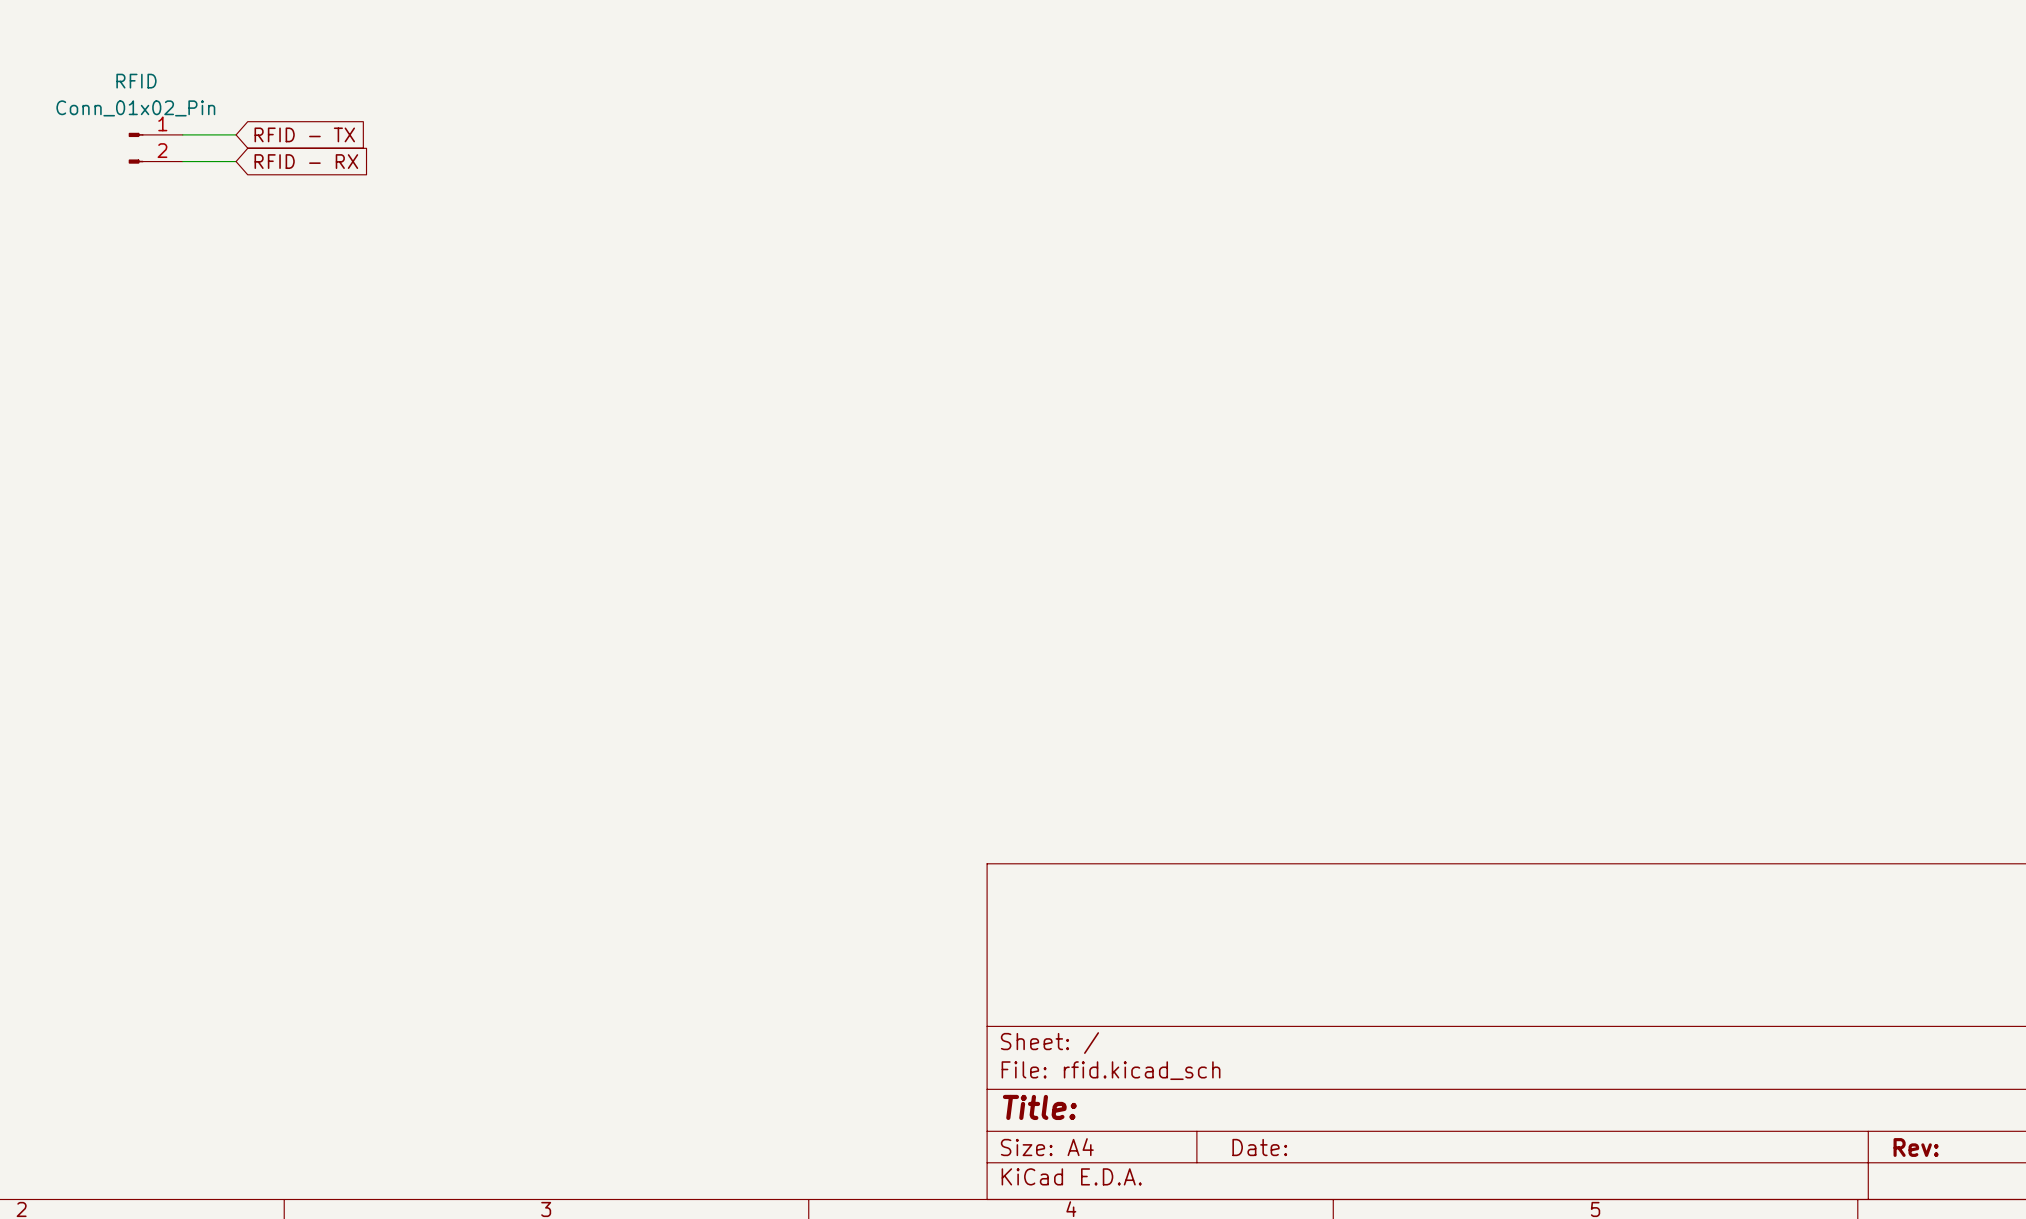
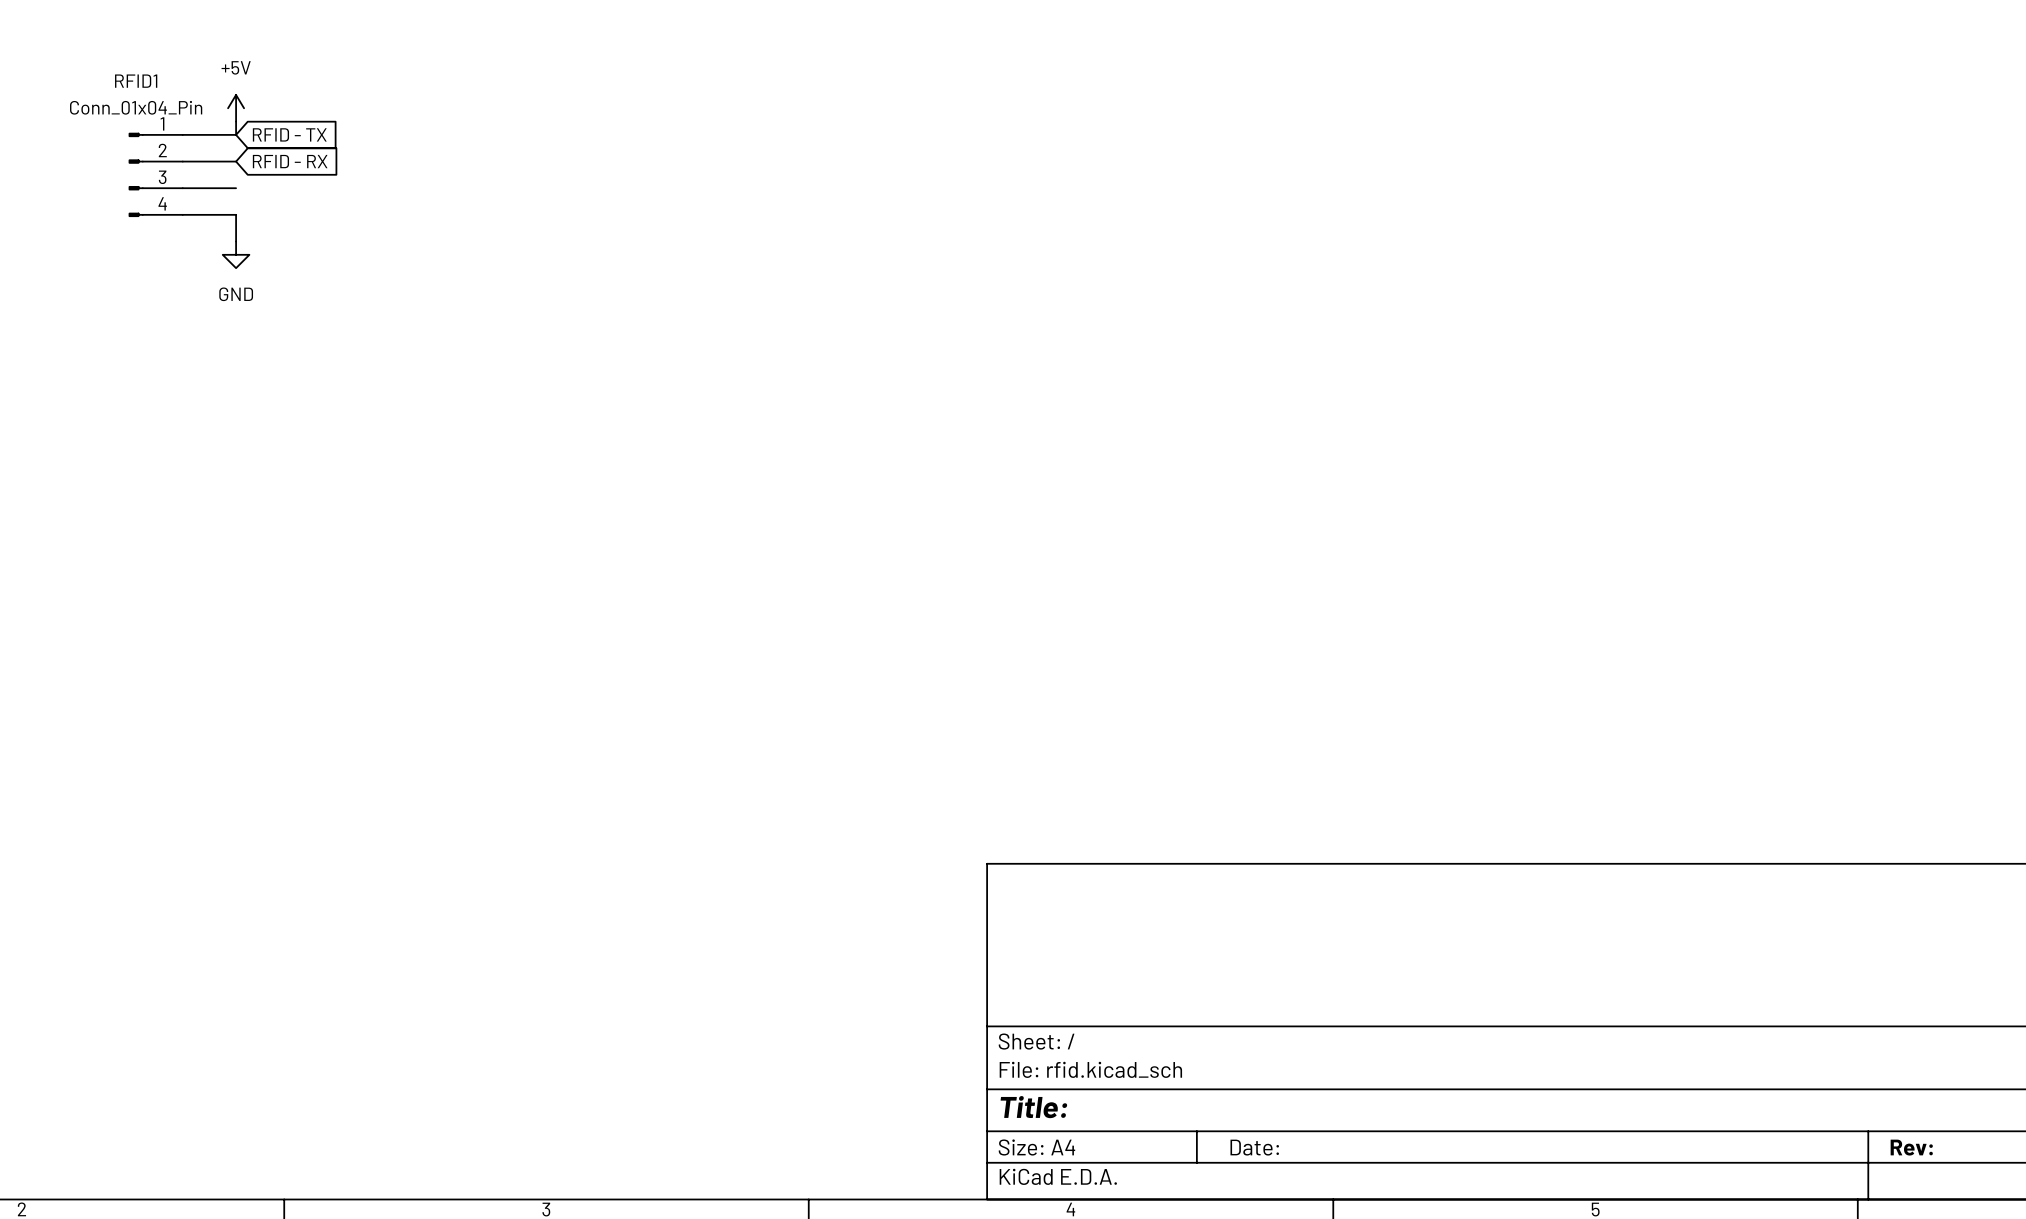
power symbol: none -> +5V (236, 108)
wire: none -> (236, 121) (236, 134)
RFID: Conn_01x02_Pin (155, 148) -> none
RFID1: none -> Conn_01x04_Pin (155, 174)
wire: none -> (182, 188) (236, 188)
wire: none -> (182, 214) (236, 214) (236, 241)
power symbol: none -> GND (236, 254)

